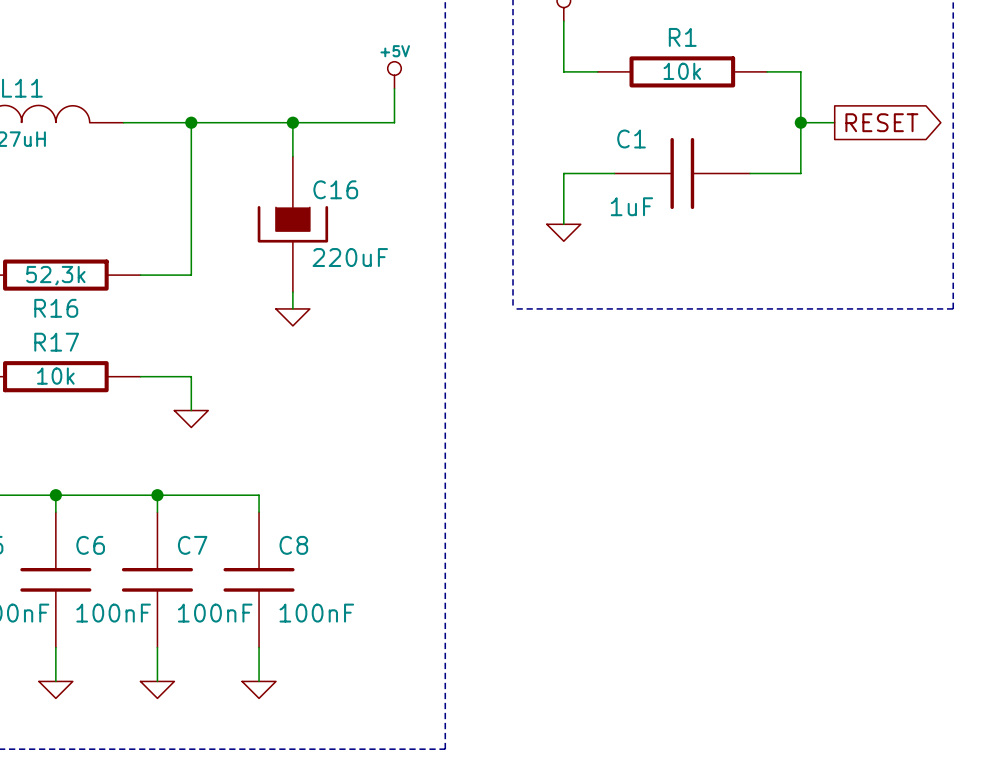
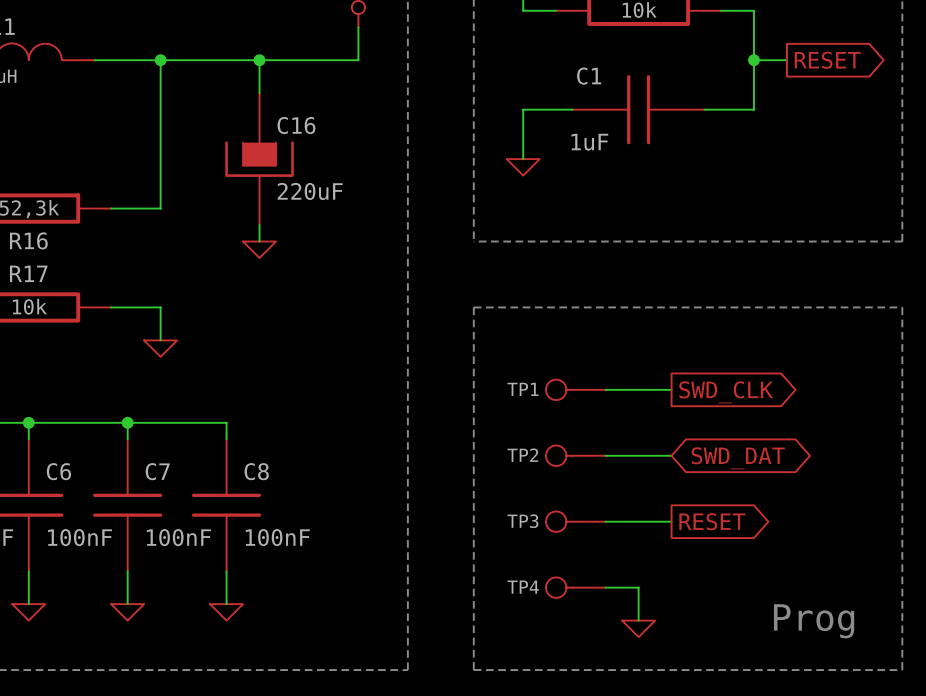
line: none -> (473, 307) (473, 670) (902, 670) (902, 307) (473, 307)
TP1: none -> (575, 389)
wire: none -> (605, 389) (671, 389)
global label: none -> SWD_CLK (726, 392)
TP2: none -> (575, 455)
wire: none -> (605, 455) (671, 455)
global label: none -> SWD_DAT (738, 458)
TP3: none -> (575, 521)
wire: none -> (605, 521) (671, 521)
global label: none -> RESET (712, 521)
TP4: none -> (575, 587)
wire: none -> (605, 587) (638, 587) (638, 620)
text: none -> Prog (814, 621)
power symbol: none -> (638, 628)

